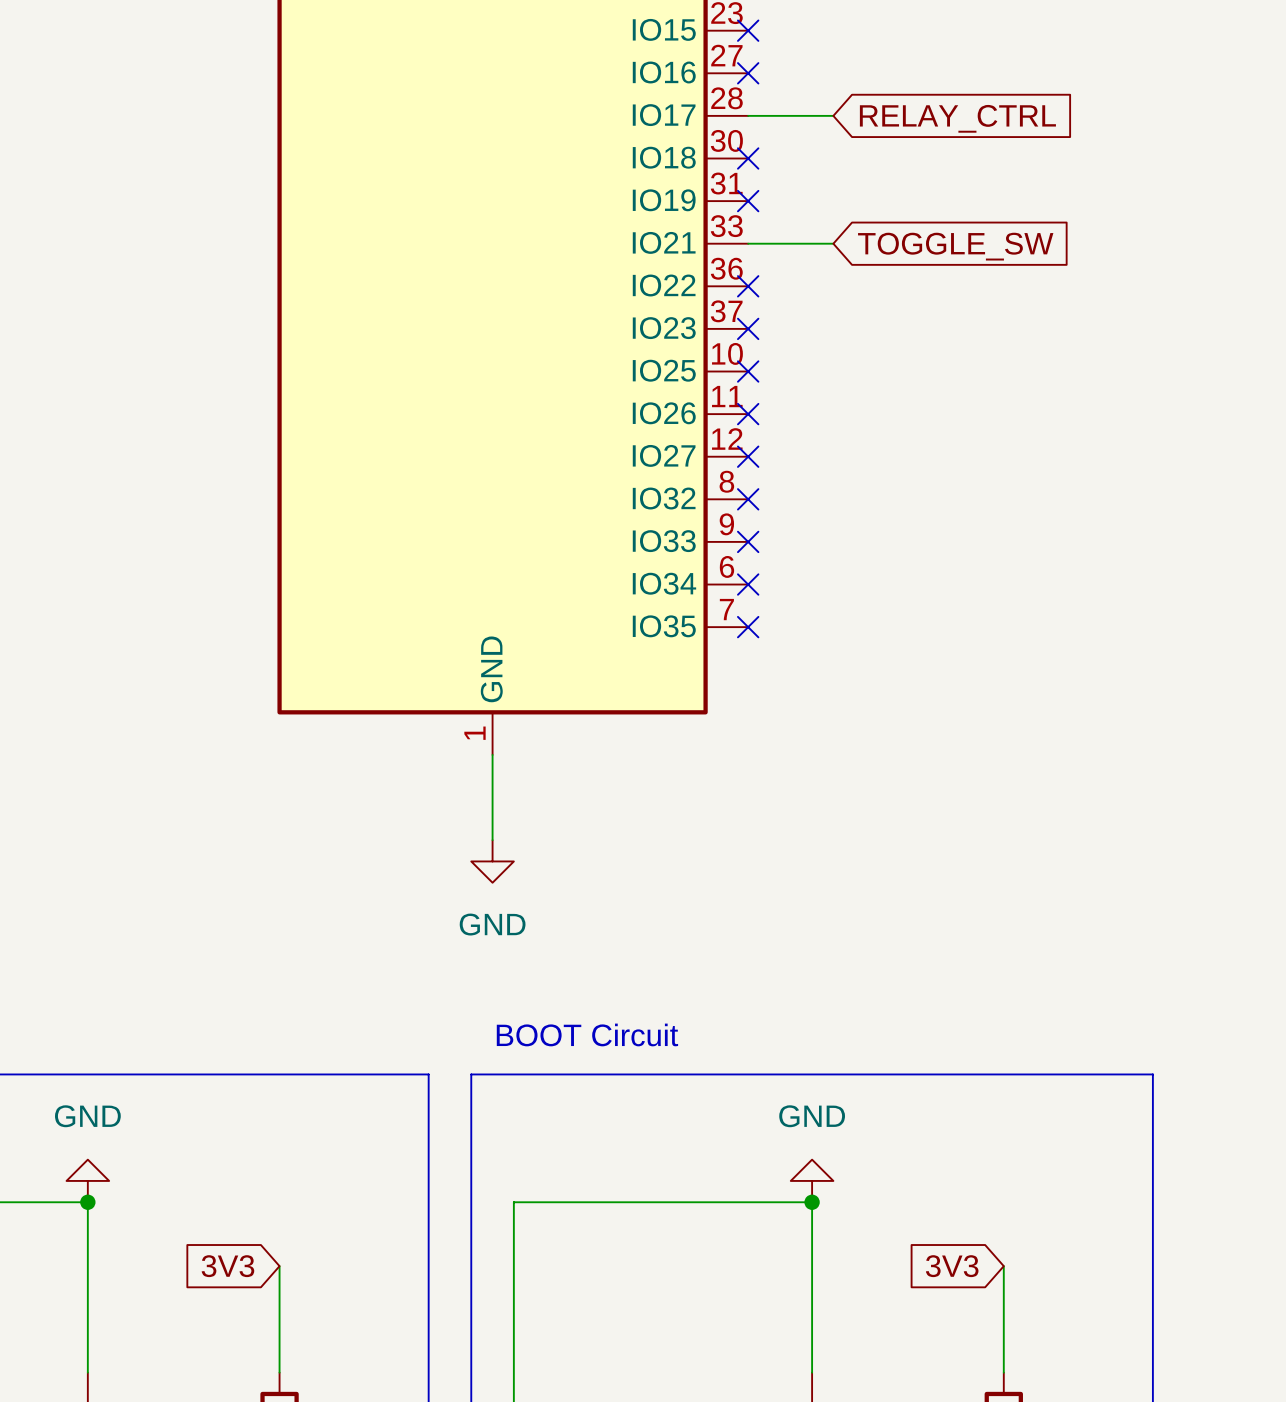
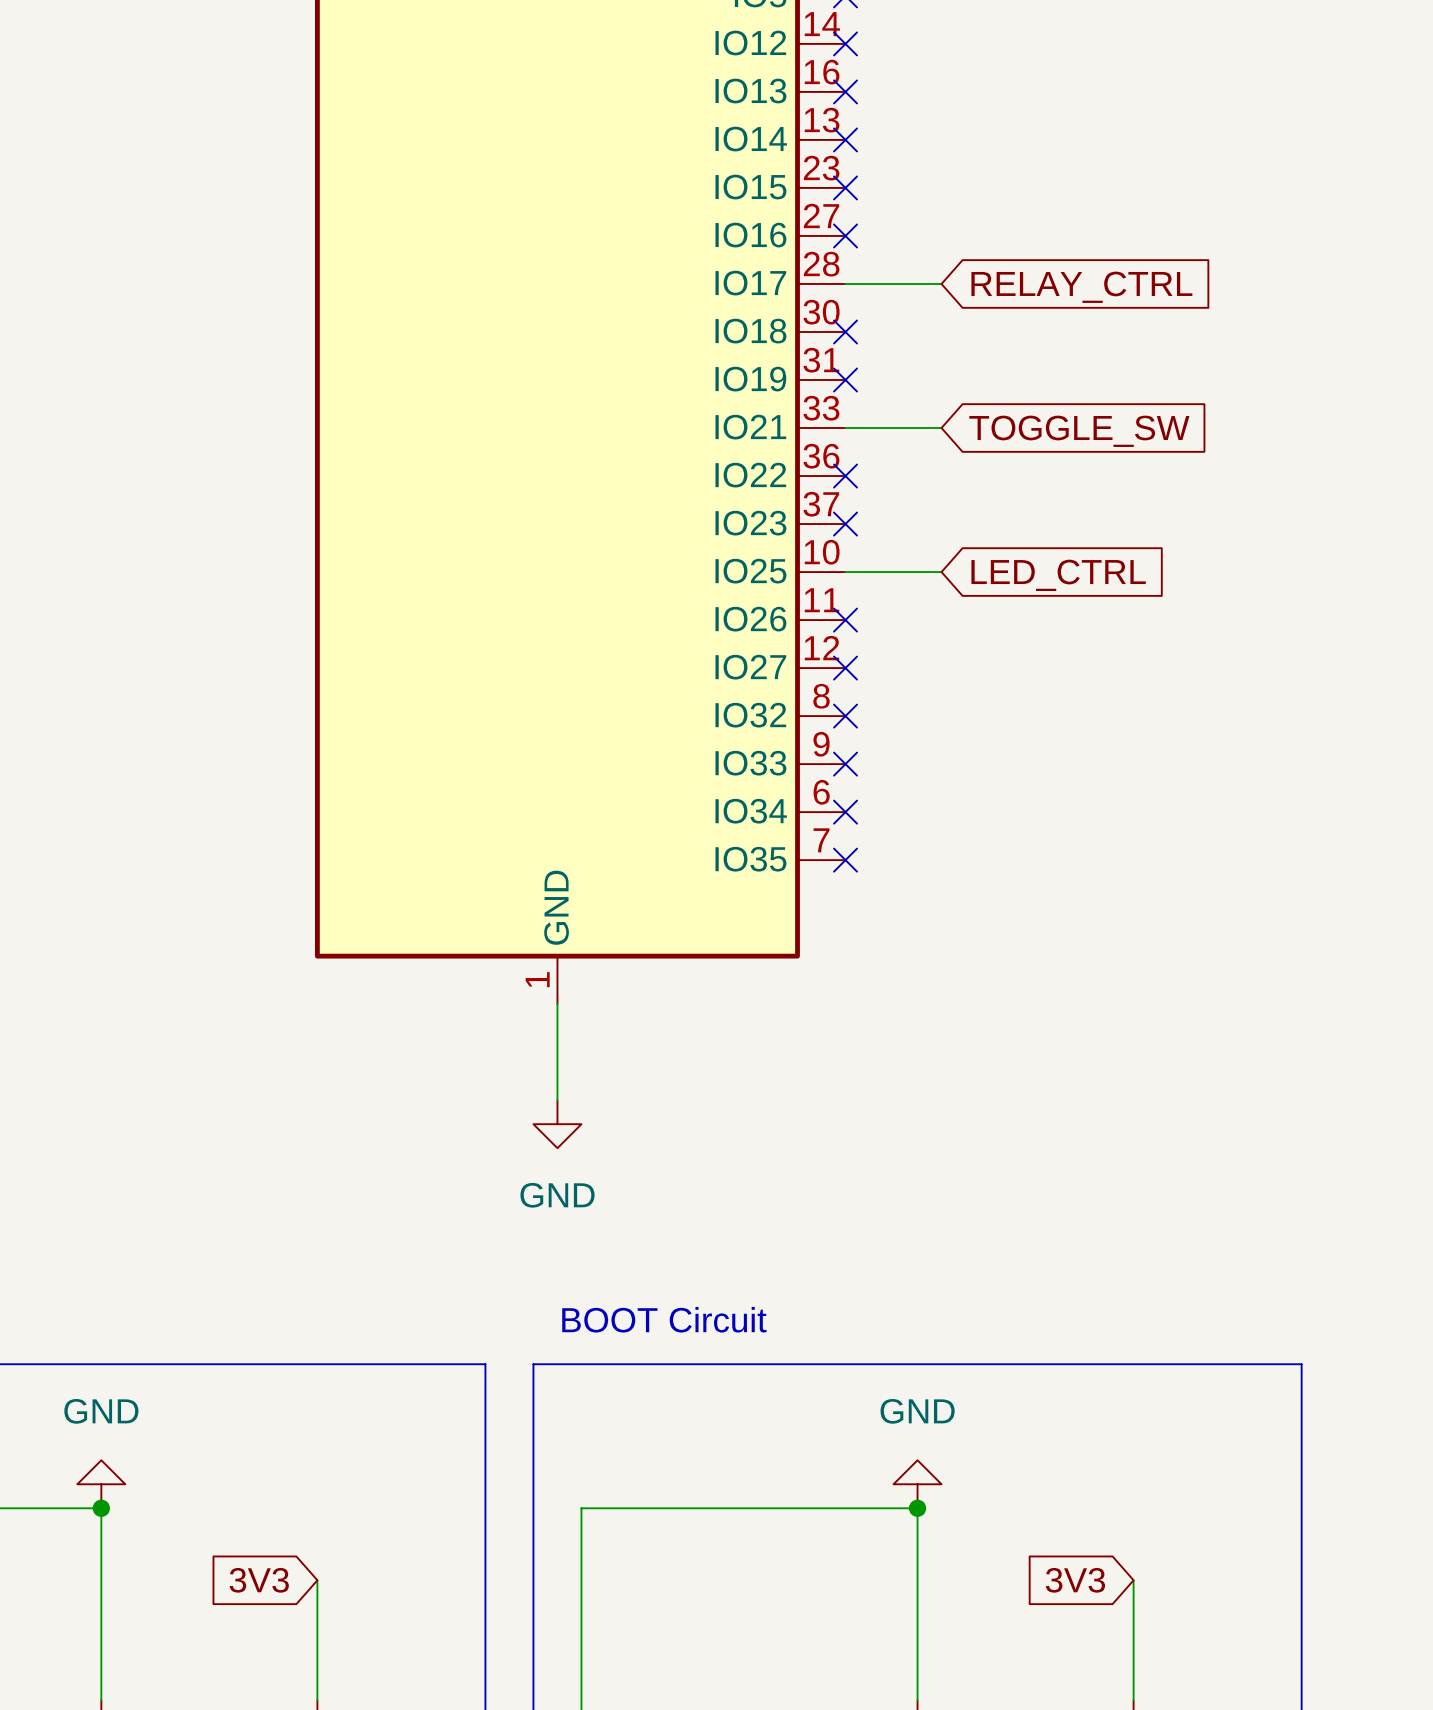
wire: none -> (845, 572) (941, 572)
no-connect mark: (748, 371) -> none
global label: none -> LED_CTRL (1058, 575)

